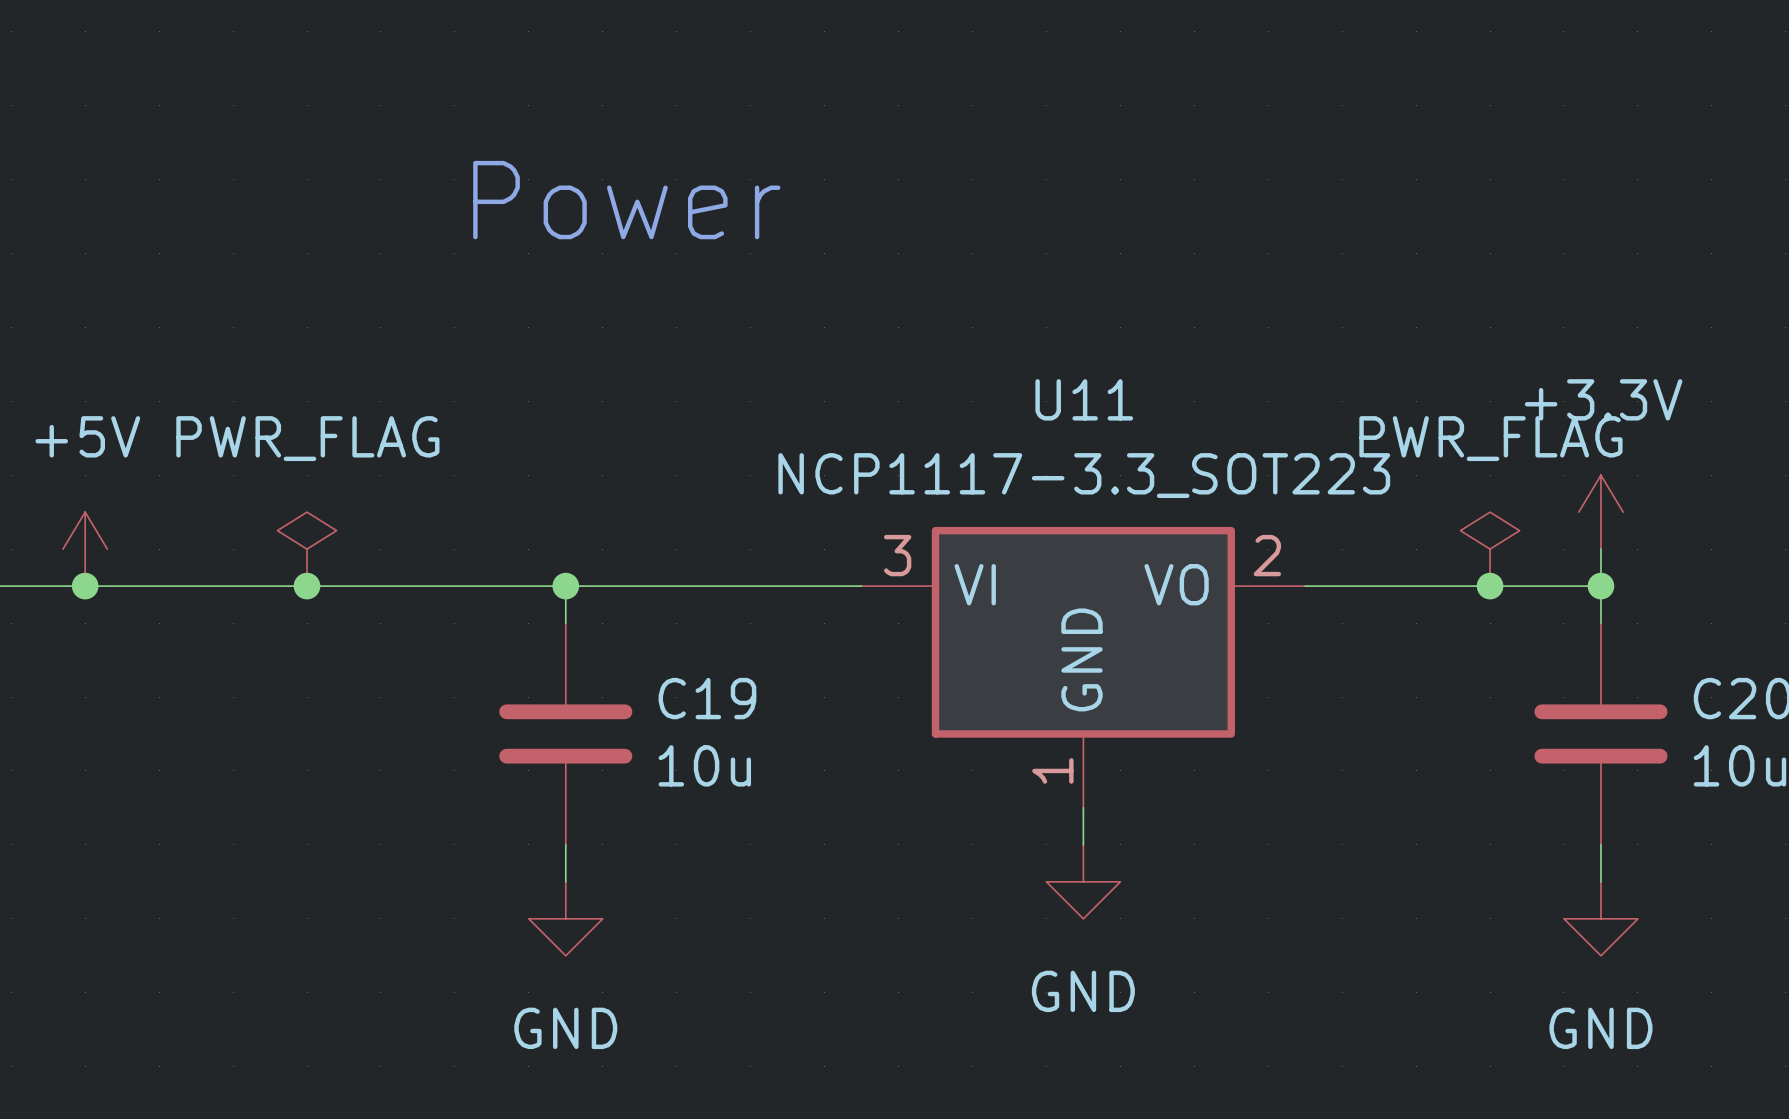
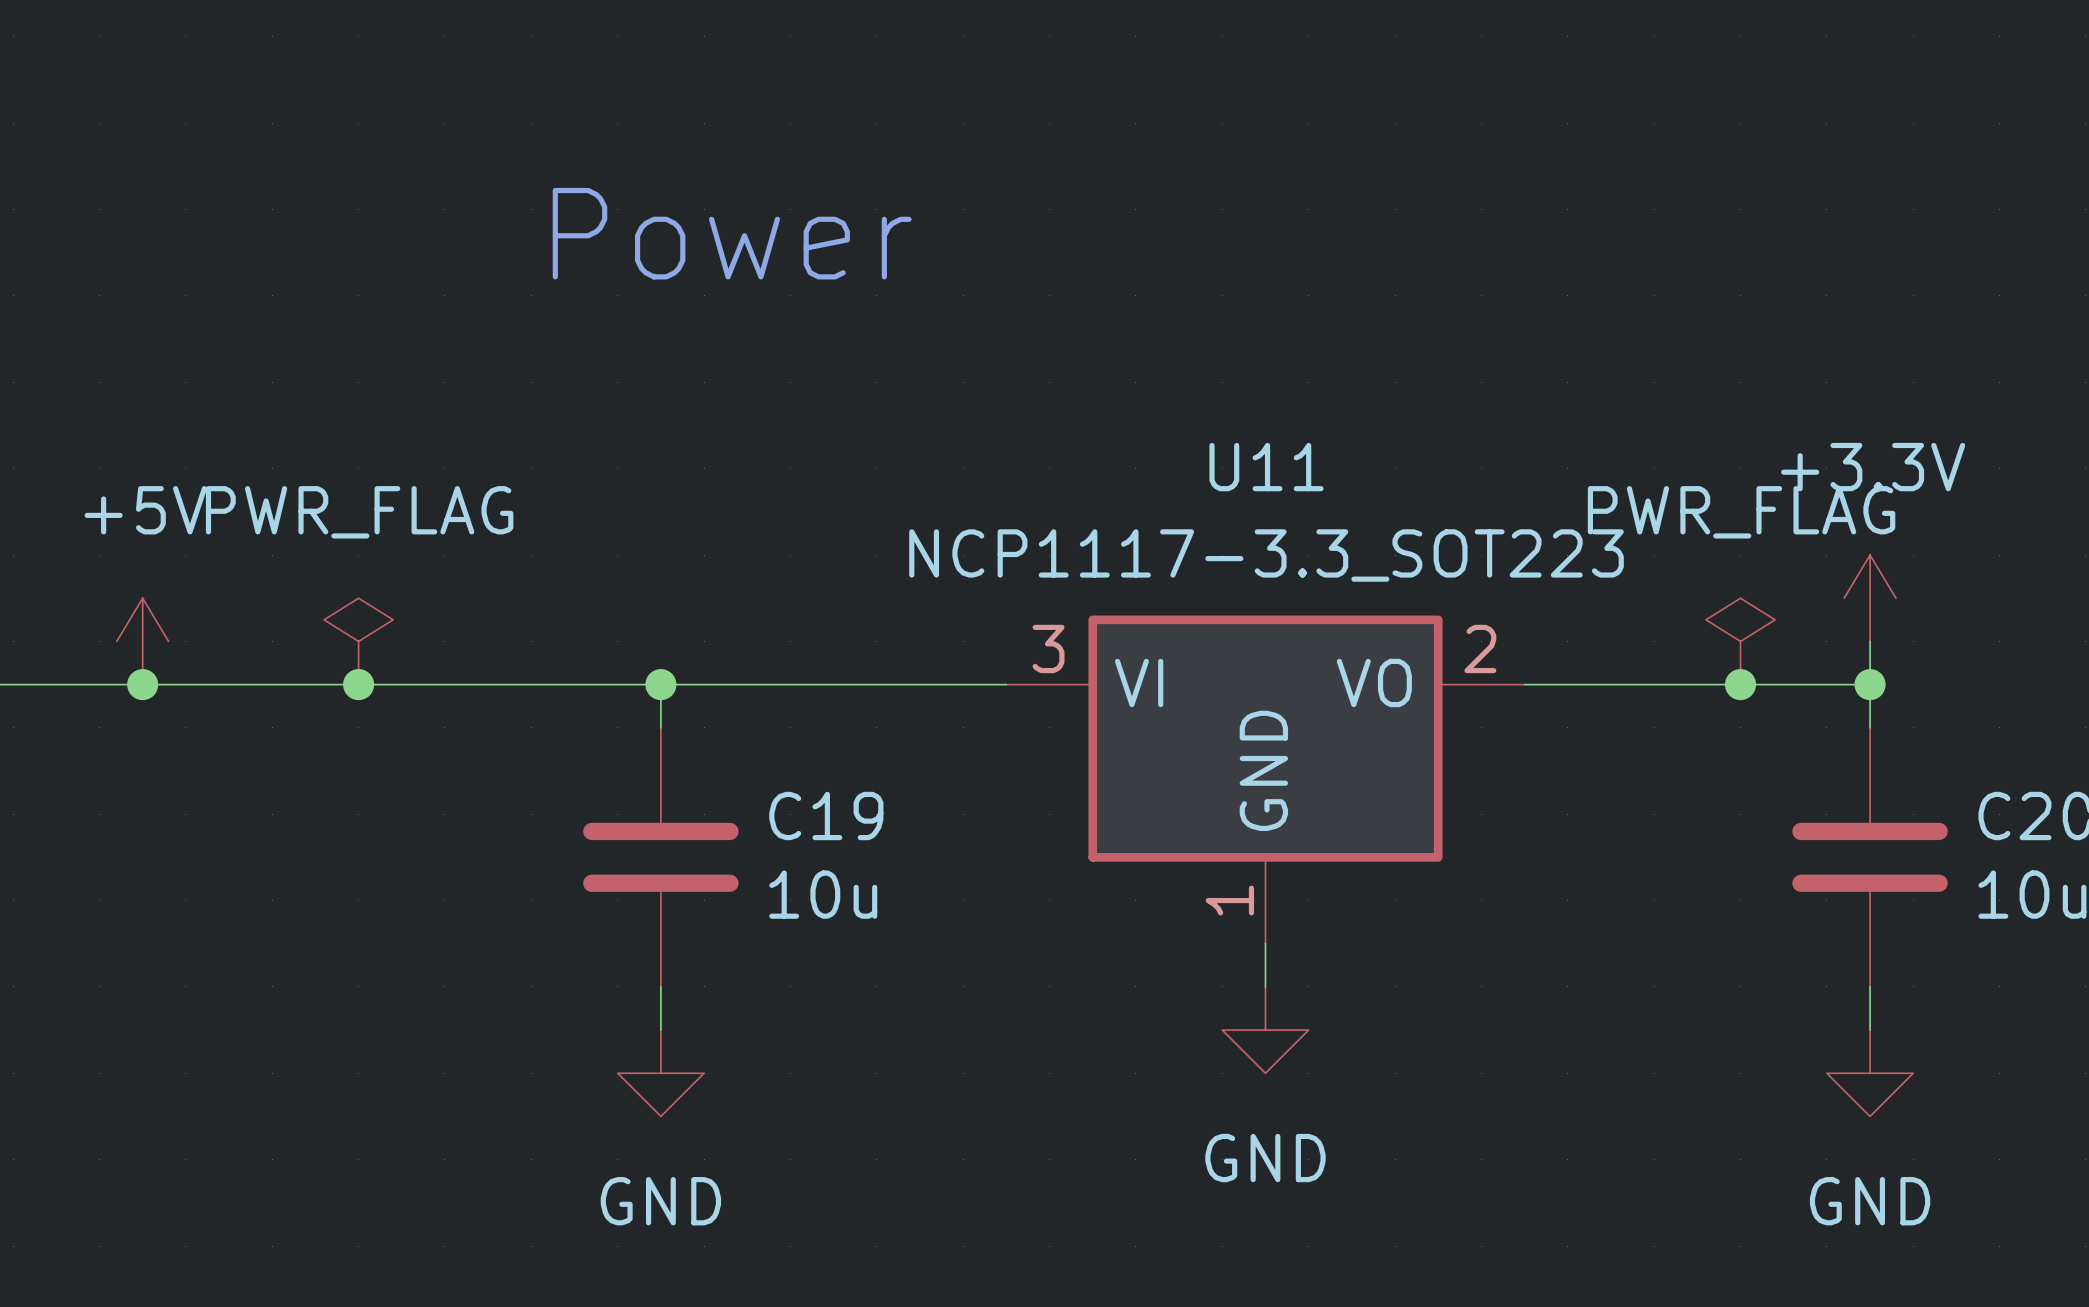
power symbol position: +5V (85, 549) -> +5V (142, 641)
junction position: (85, 586) -> (142, 684)

